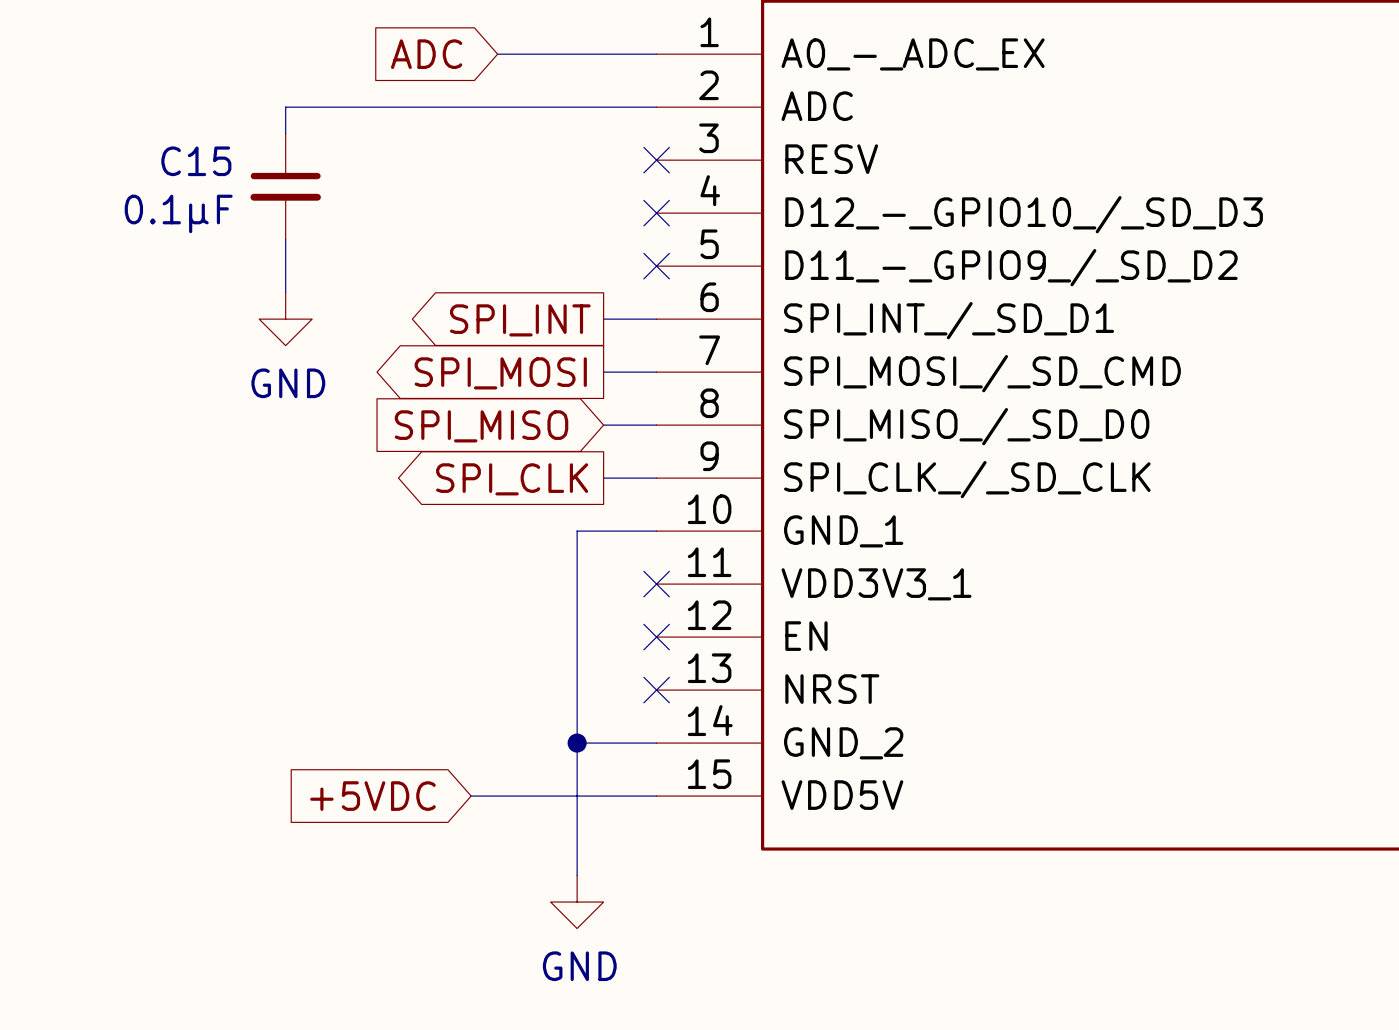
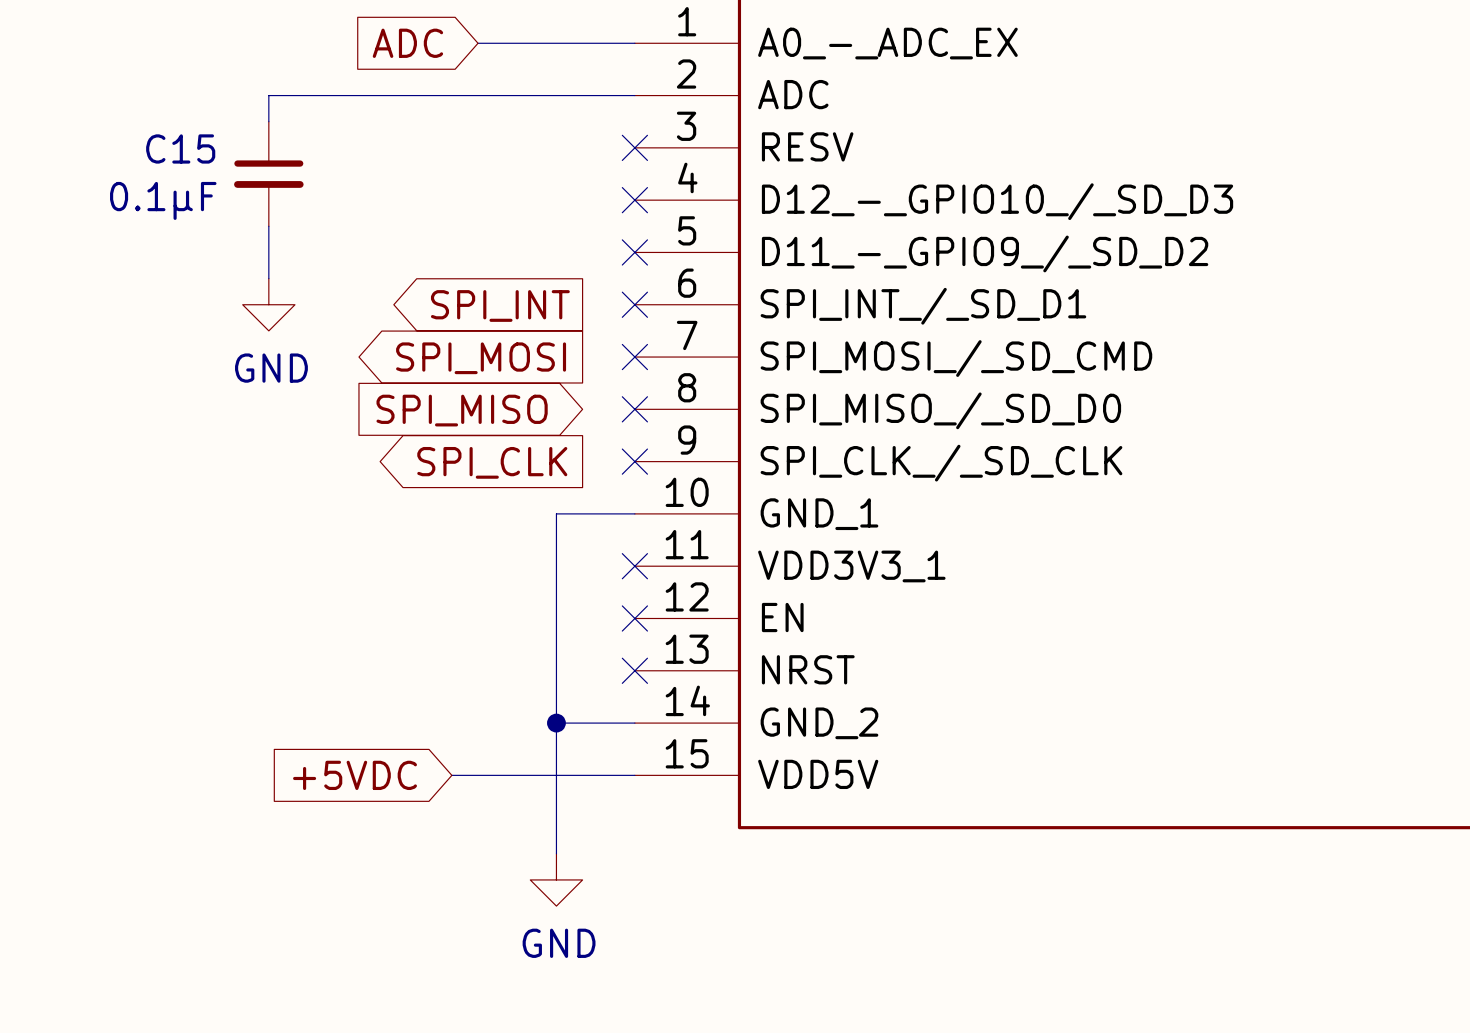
wire: (603, 319) (656, 319) -> none
no-connect mark: none -> (634, 304)
wire: (603, 372) (656, 372) -> none
no-connect mark: none -> (634, 357)
wire: (603, 425) (656, 425) -> none
no-connect mark: none -> (634, 409)
wire: (603, 478) (656, 478) -> none
no-connect mark: none -> (634, 461)

